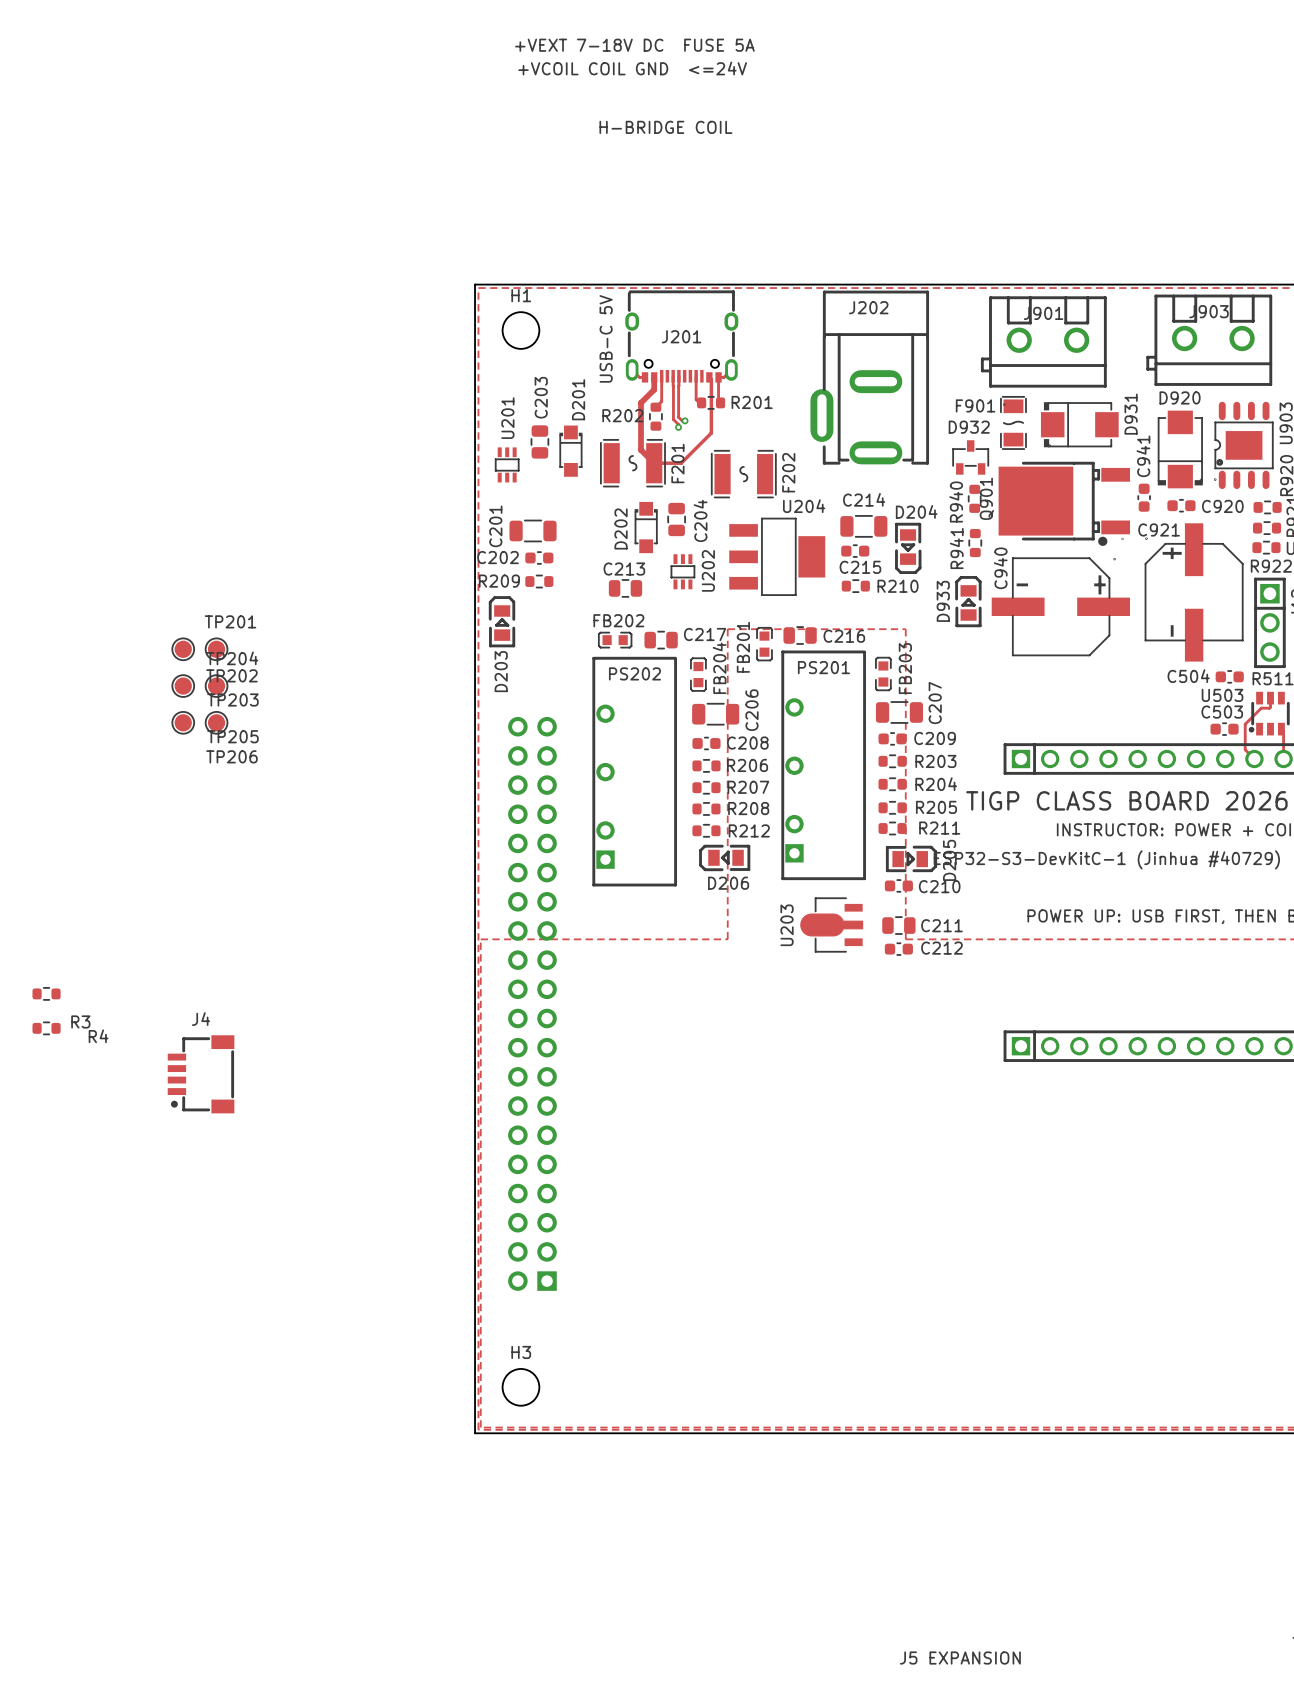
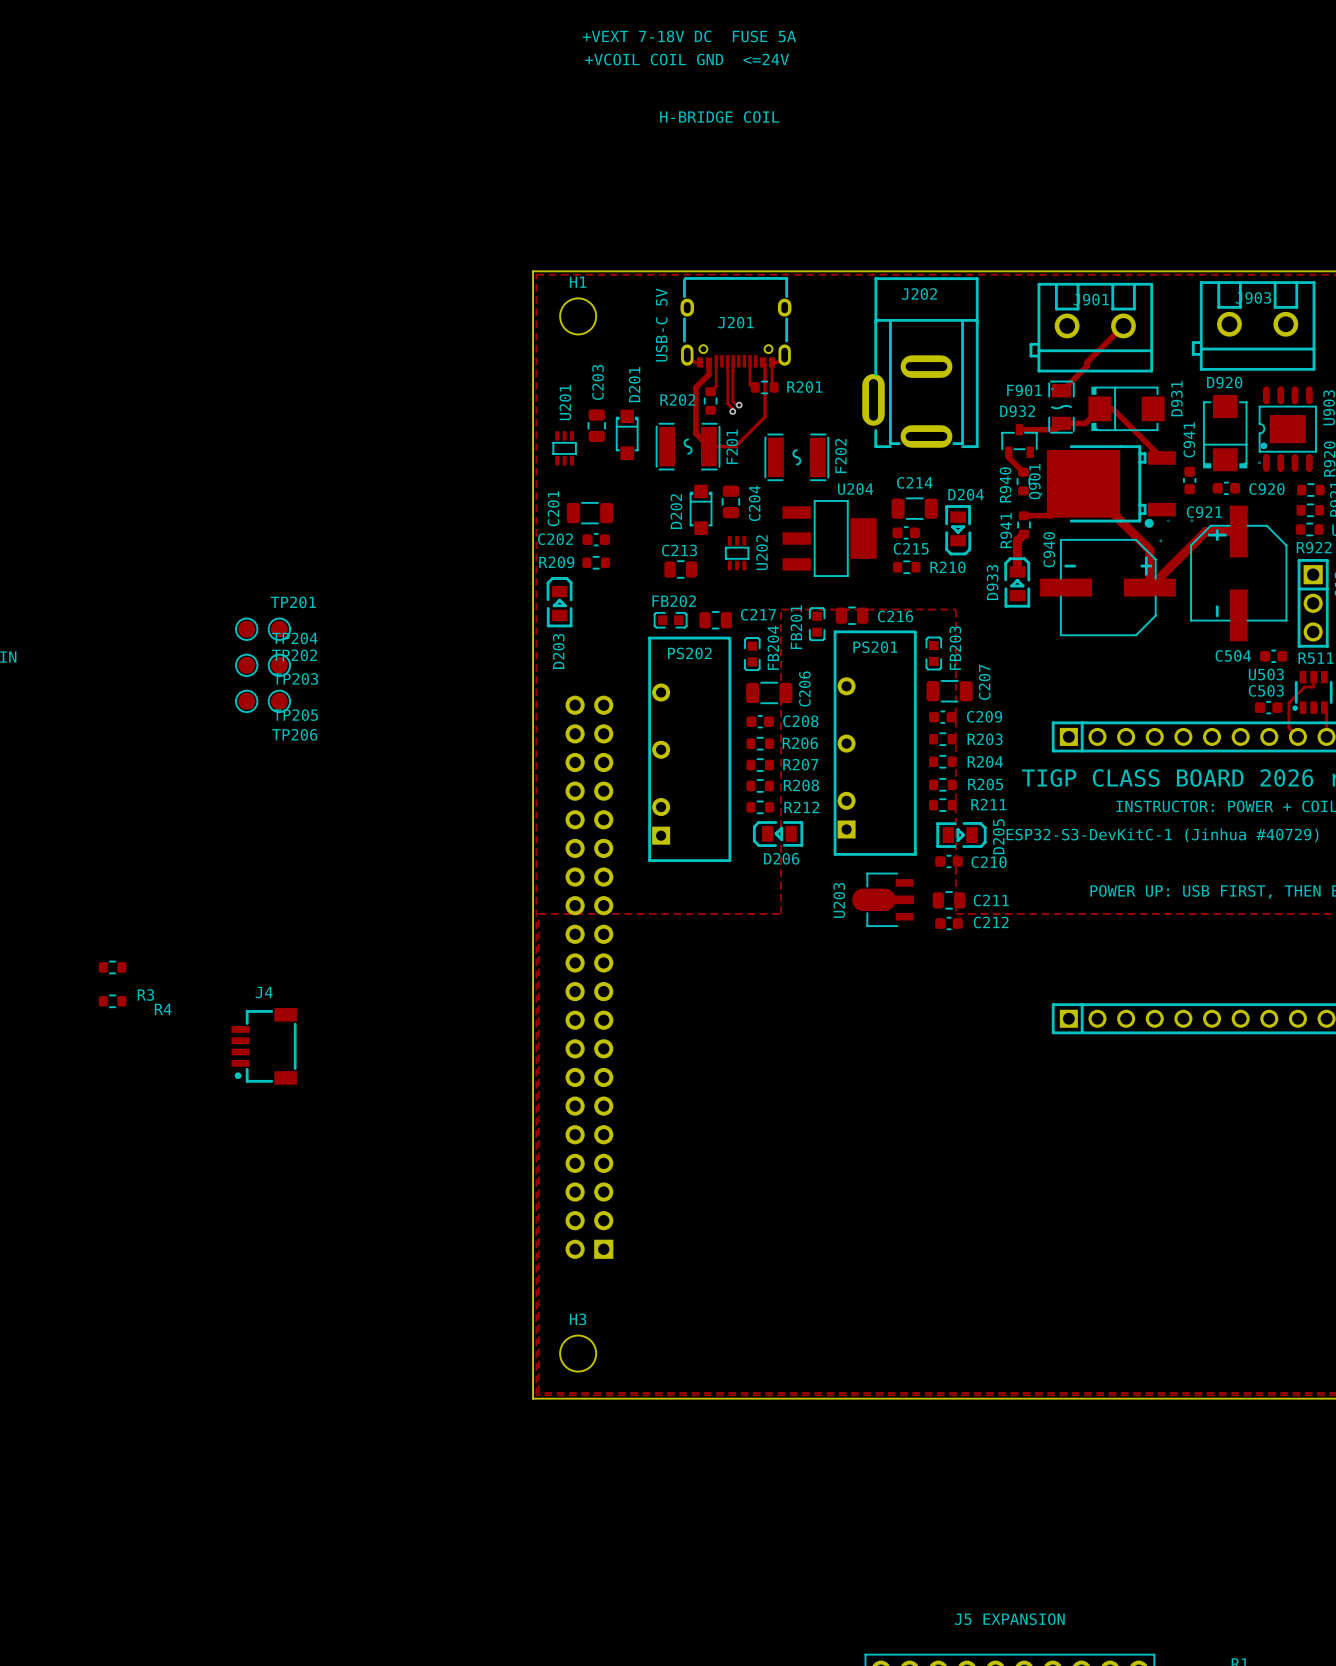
track: none -> (1123, 325) (1061, 390)
track: none -> (1019, 429) (1055, 429) (1061, 423) (1085, 423) (1099, 408) (1112, 408) (1161, 458)
track: none -> (1008, 452) (1008, 457) (1023, 472)
track: none -> (1024, 515) (1051, 515) (1083, 483) (1149, 550) (1149, 587) (1205, 531) (1238, 531)
track: none -> (1024, 534) (1017, 540) (1017, 571)

